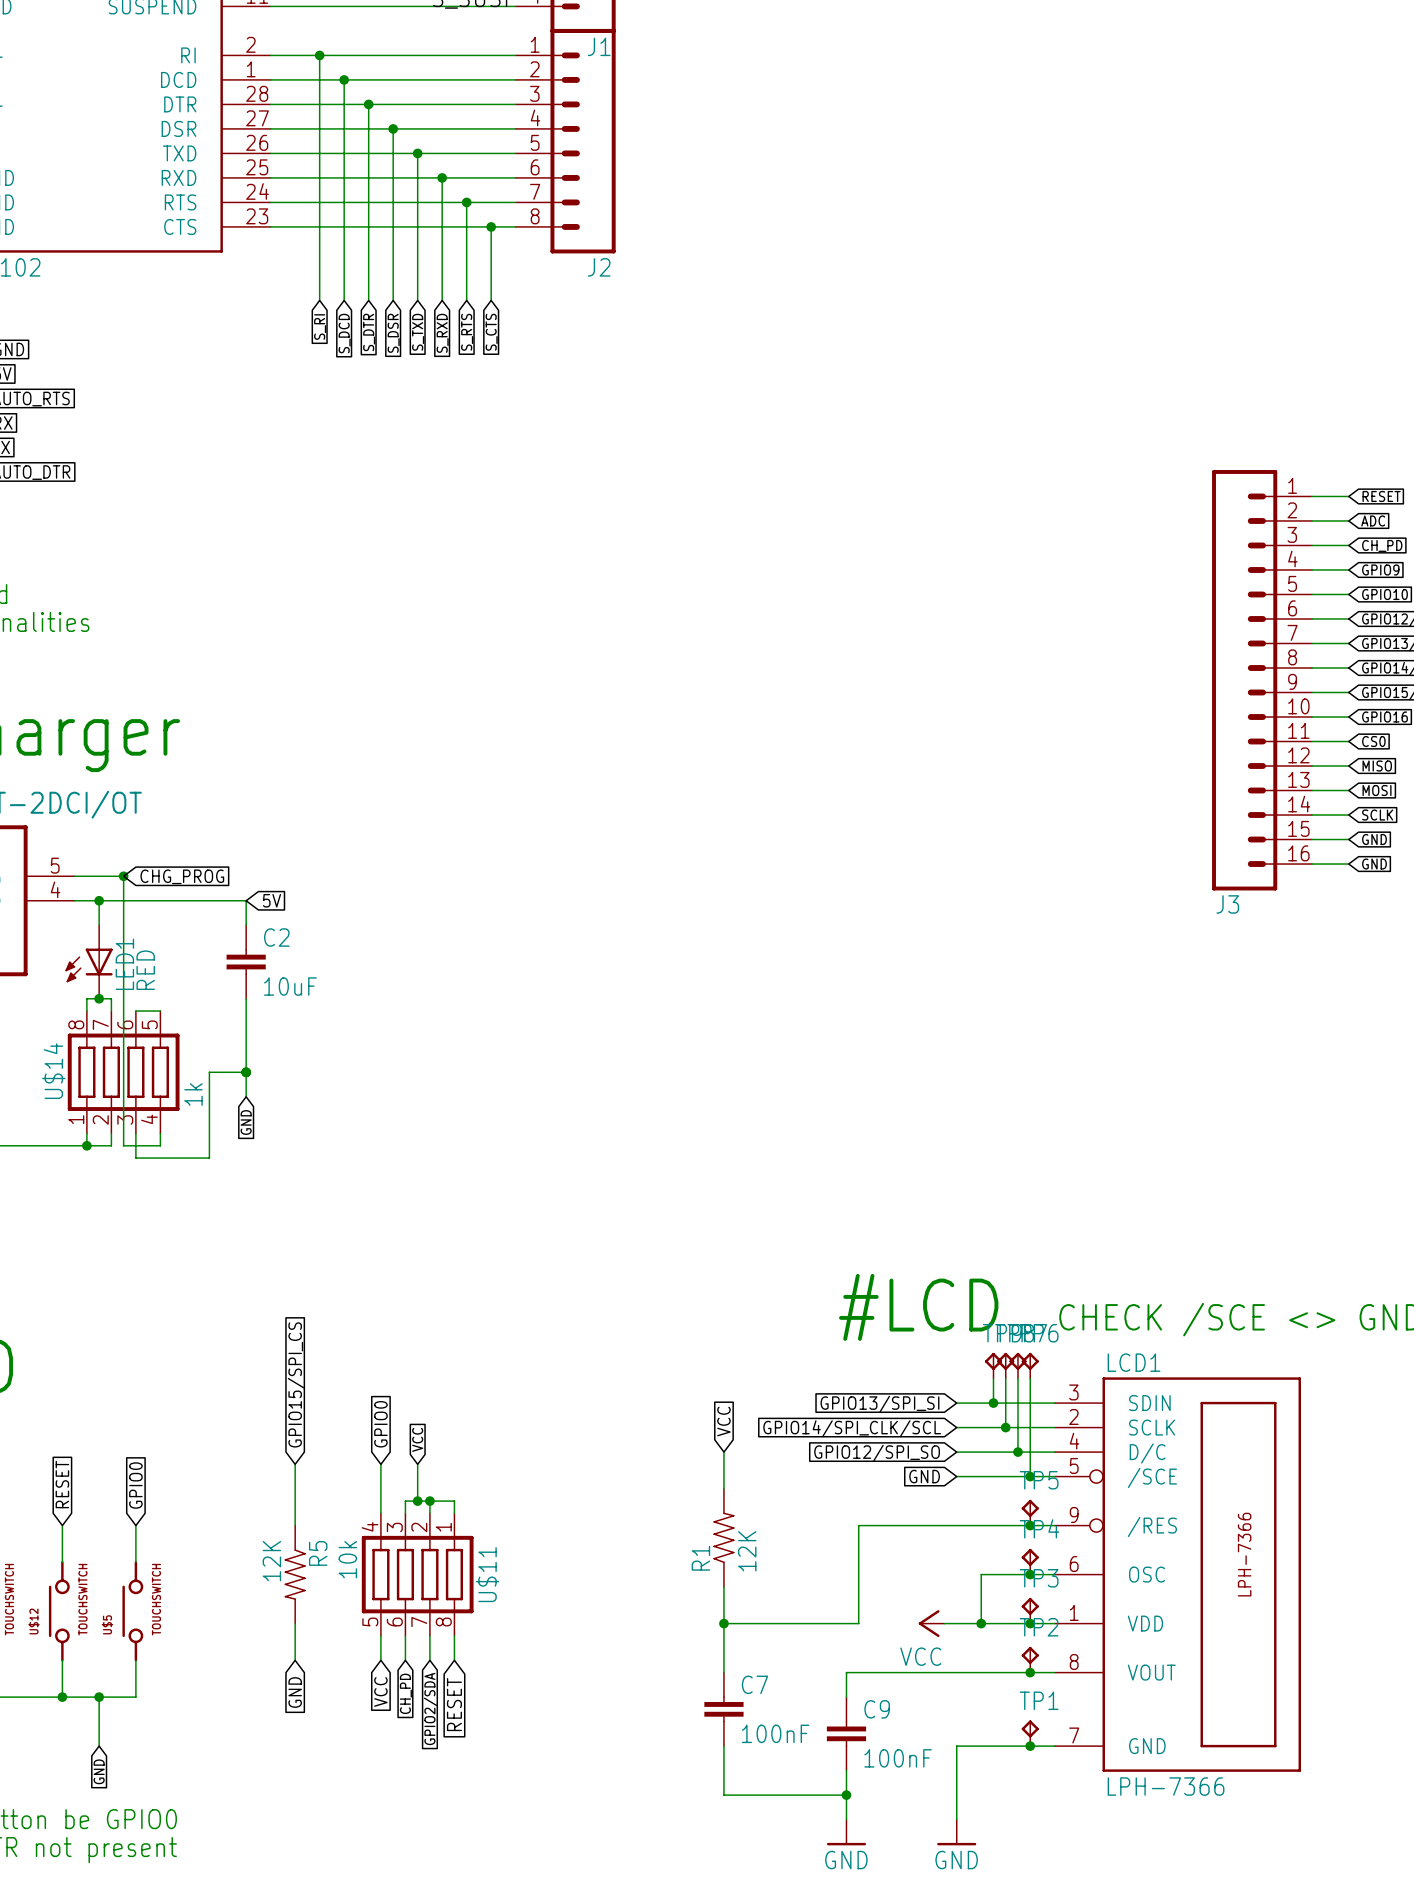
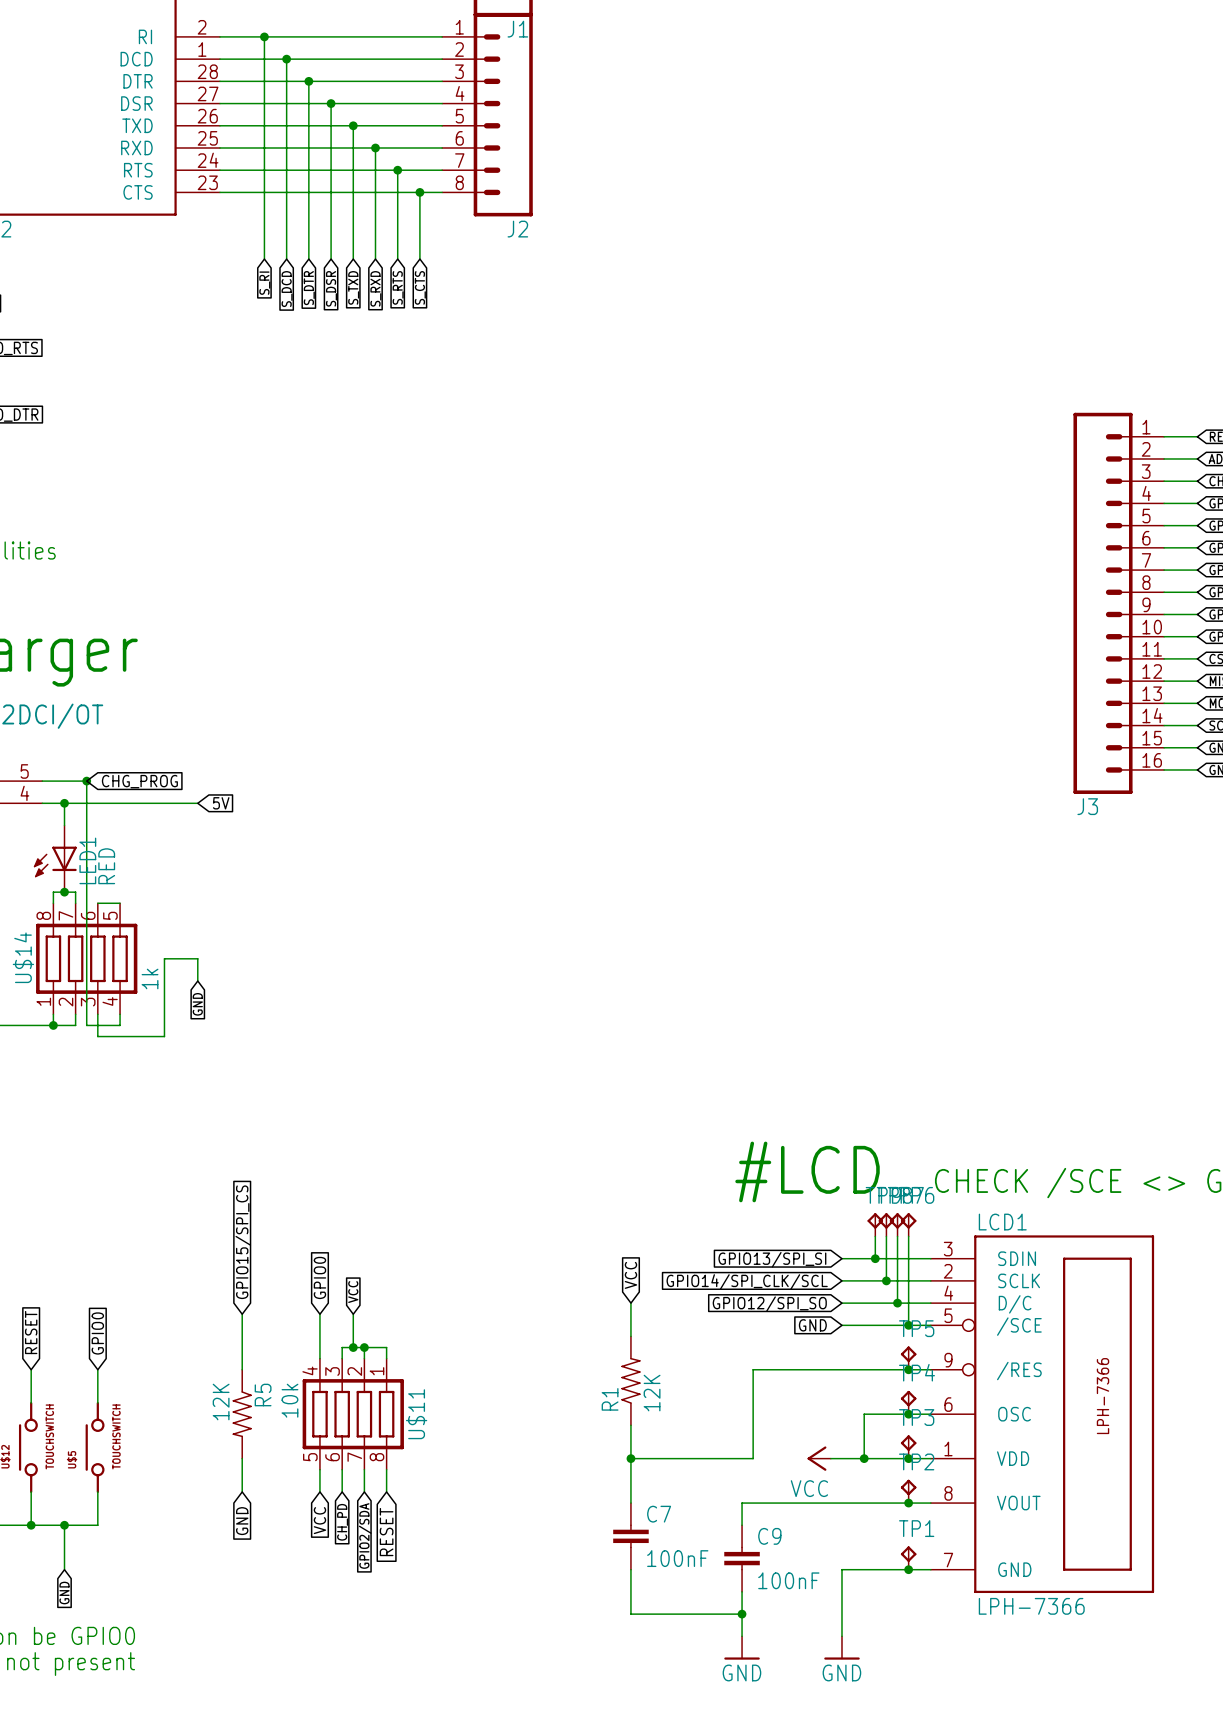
wire: (246, 900) (246, 925) -> none
C2: 10uF (246, 962) -> none
wire: (246, 998) (246, 1072) -> none
junction: (246, 1072) -> none

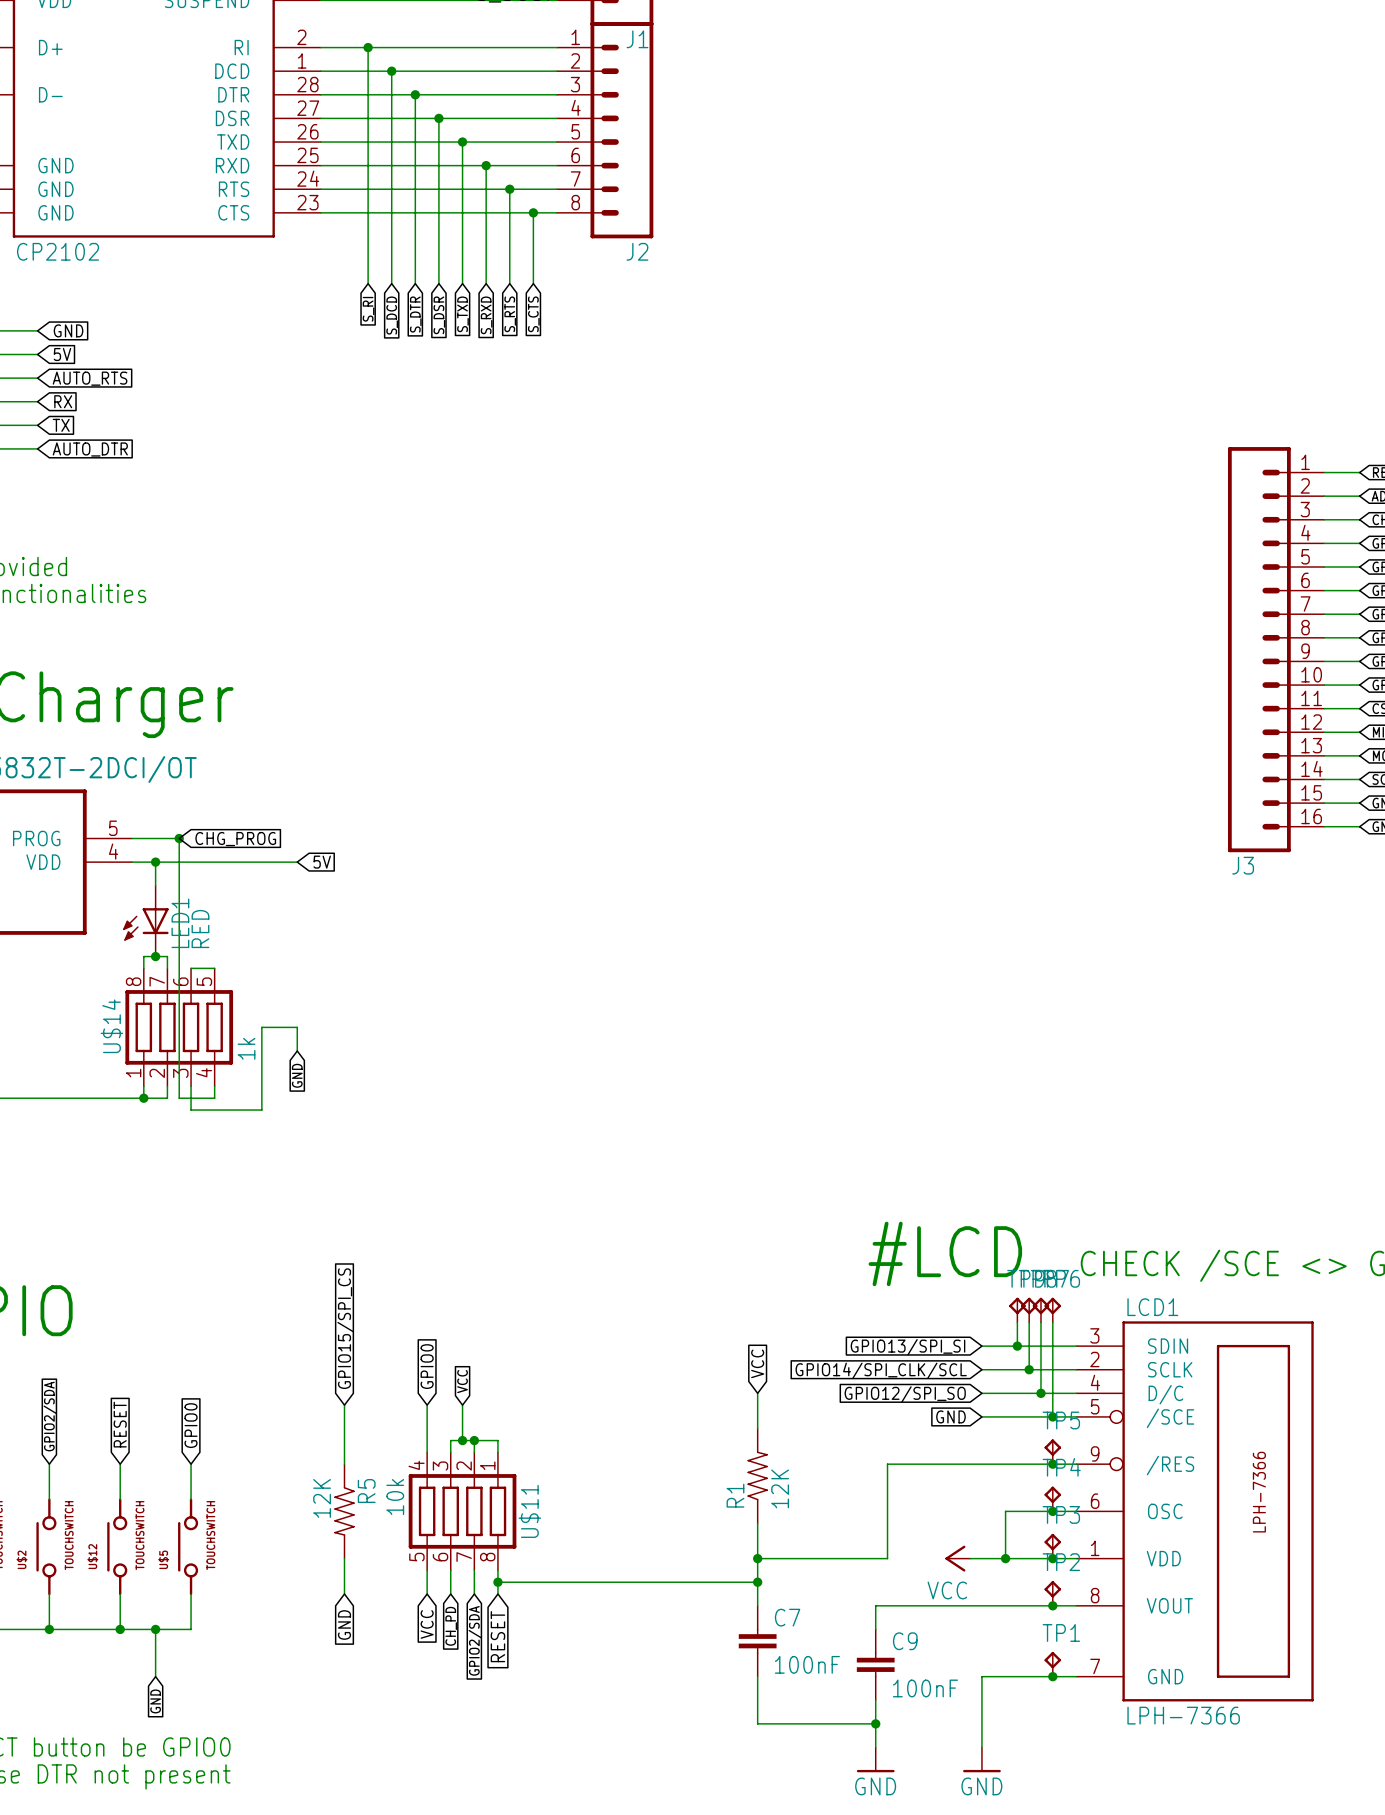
wire: none -> (497, 1582) (757, 1582)
junction: none -> (497, 1582)
junction: none -> (757, 1582)

